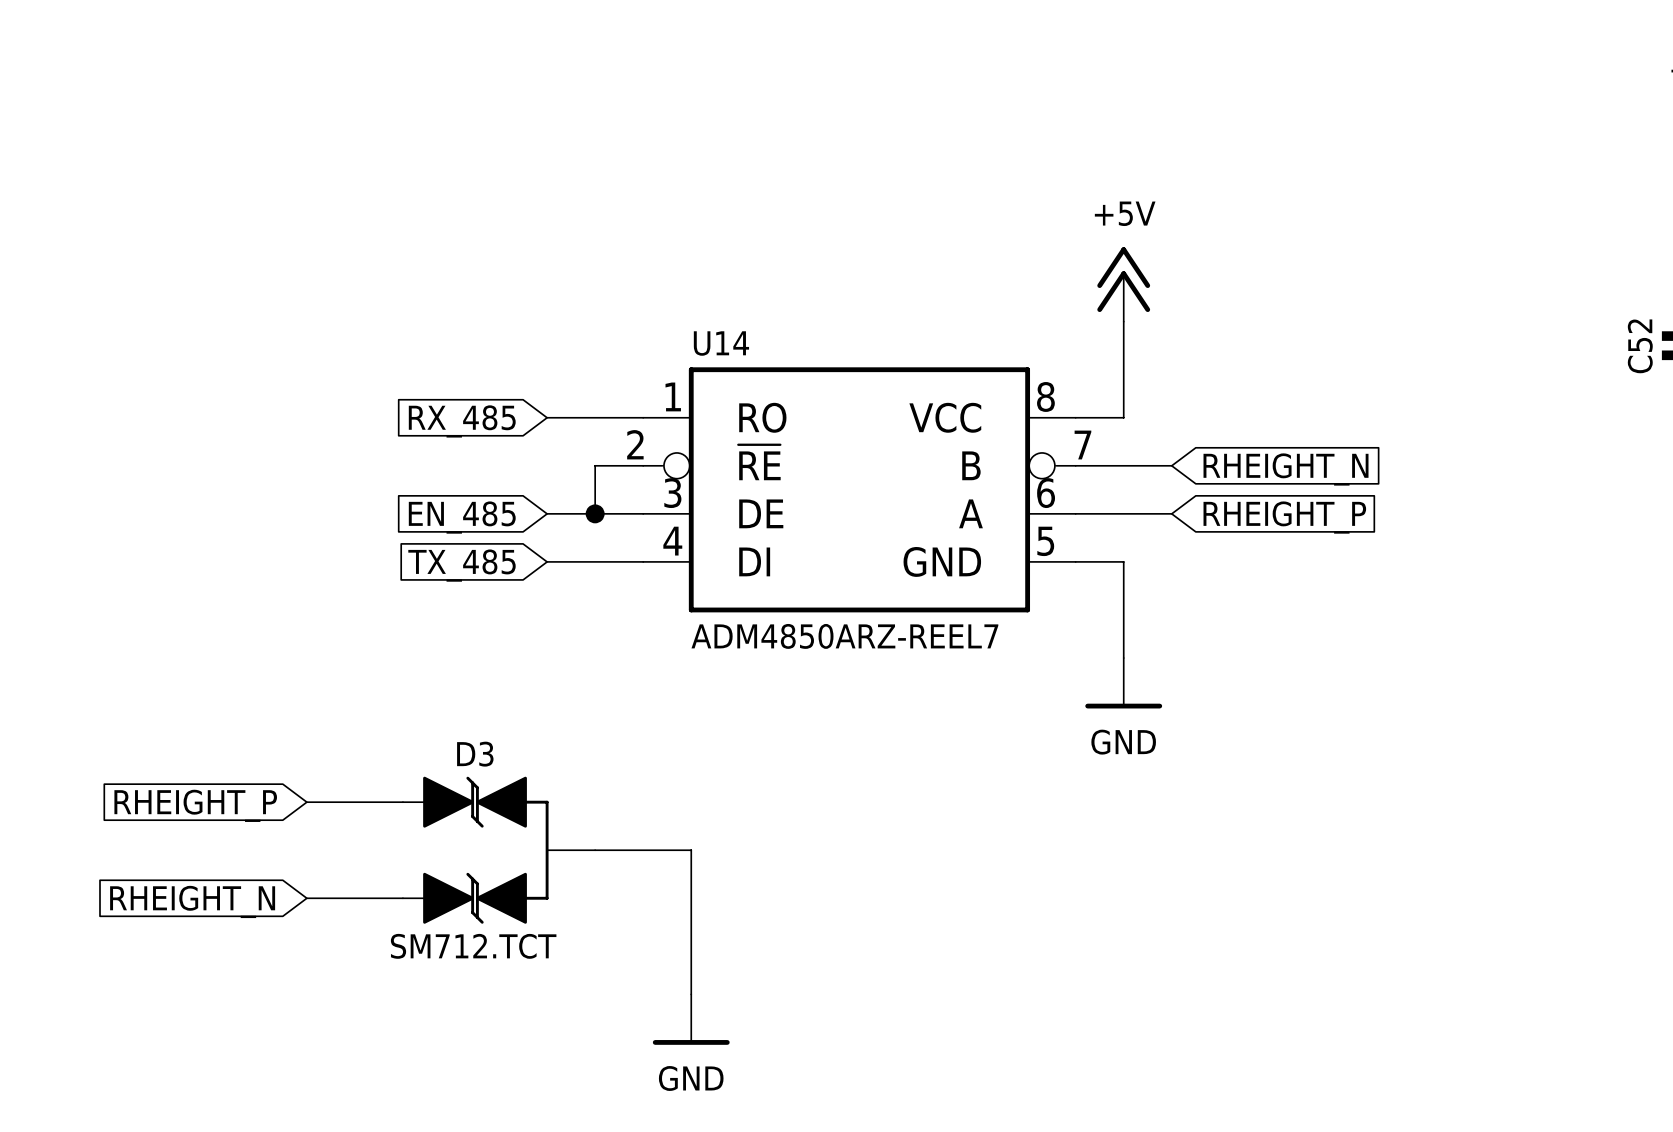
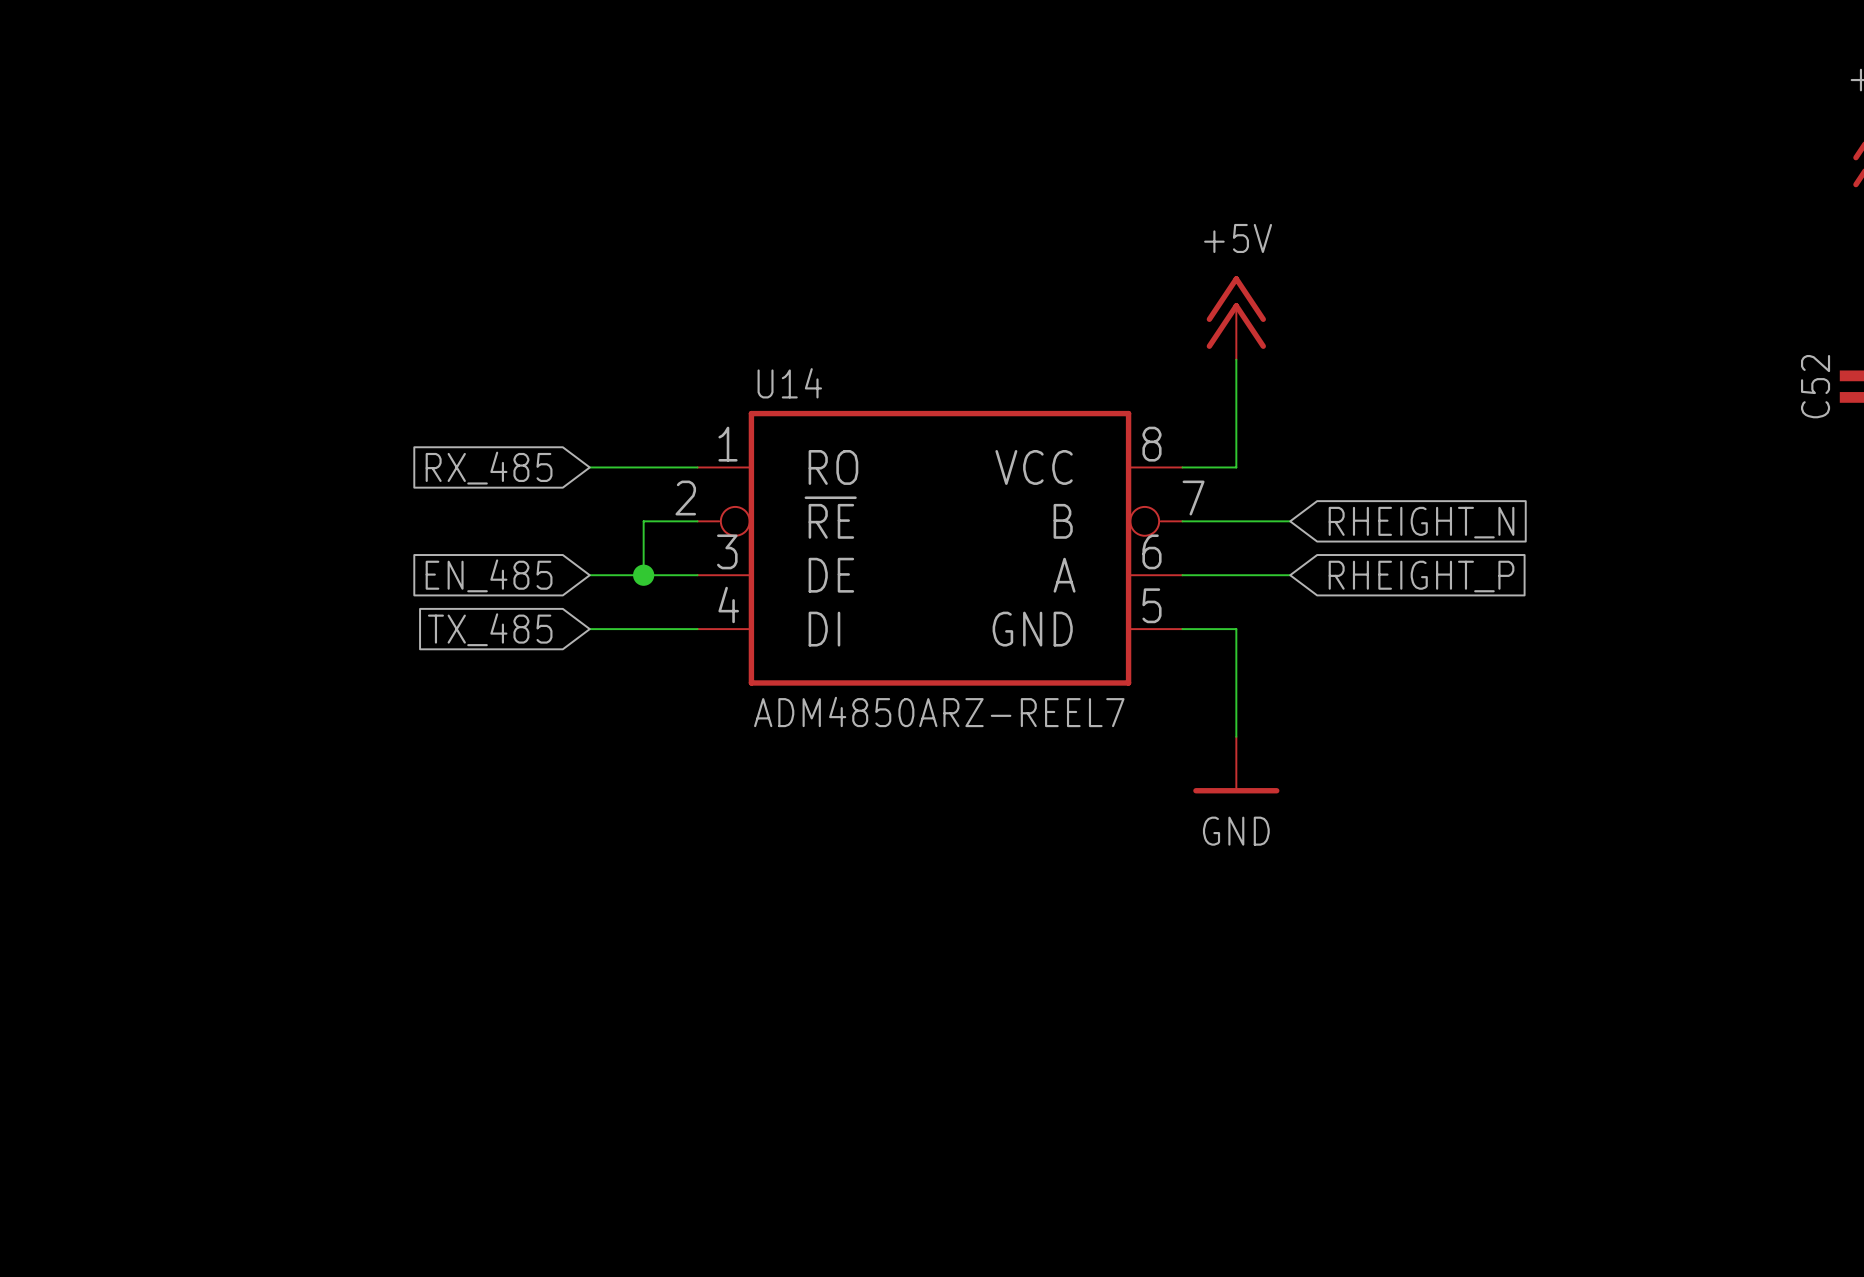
wire: (306, 802) (402, 802) -> none
global label: RHEIGHT_P (195, 805) -> none
D3: (499, 850) -> none
wire: (595, 850) (691, 850) (691, 994) -> none
wire: (306, 898) (402, 898) -> none
global label: RHEIGHT_N (192, 901) -> none
power symbol: GND (691, 1019) -> none

